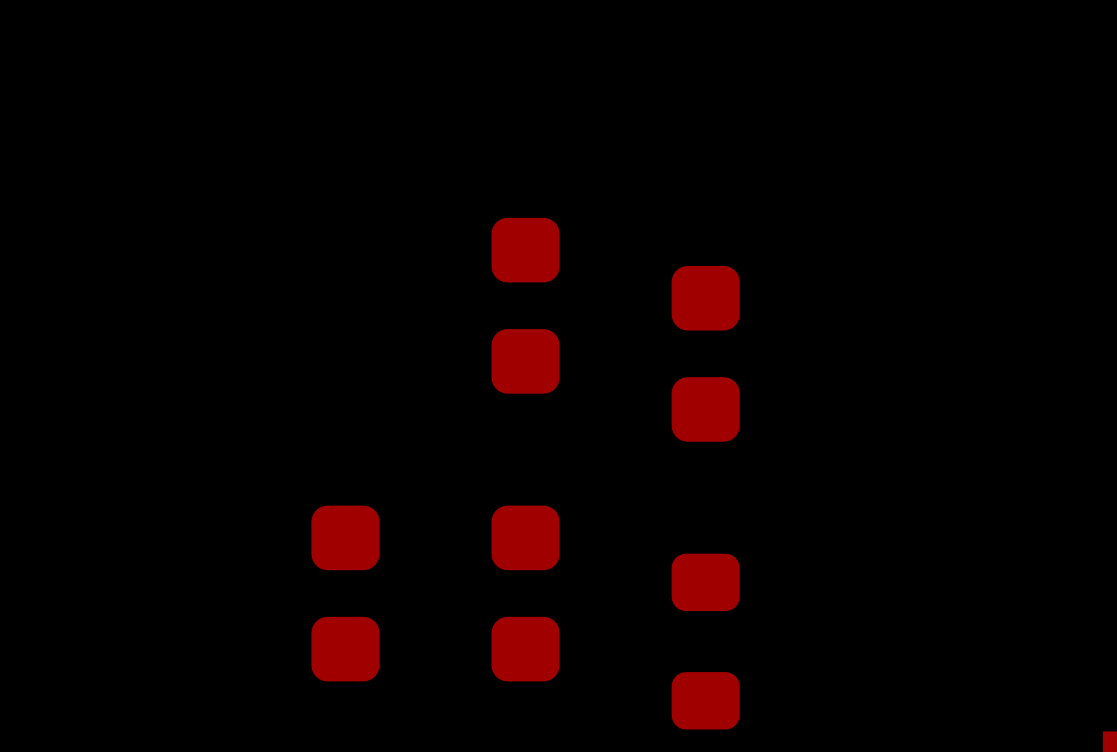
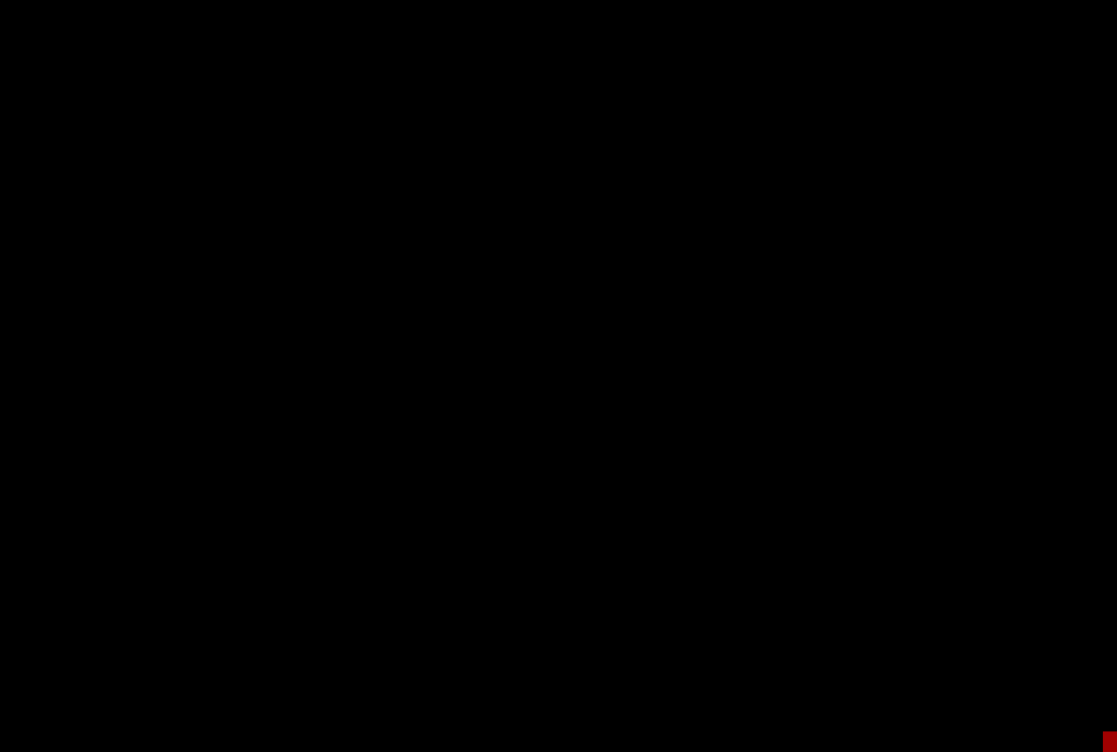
part: (525, 305) -> none
part: (705, 353) -> none
part: (345, 593) -> none
part: (525, 593) -> none
part: (705, 641) -> none

